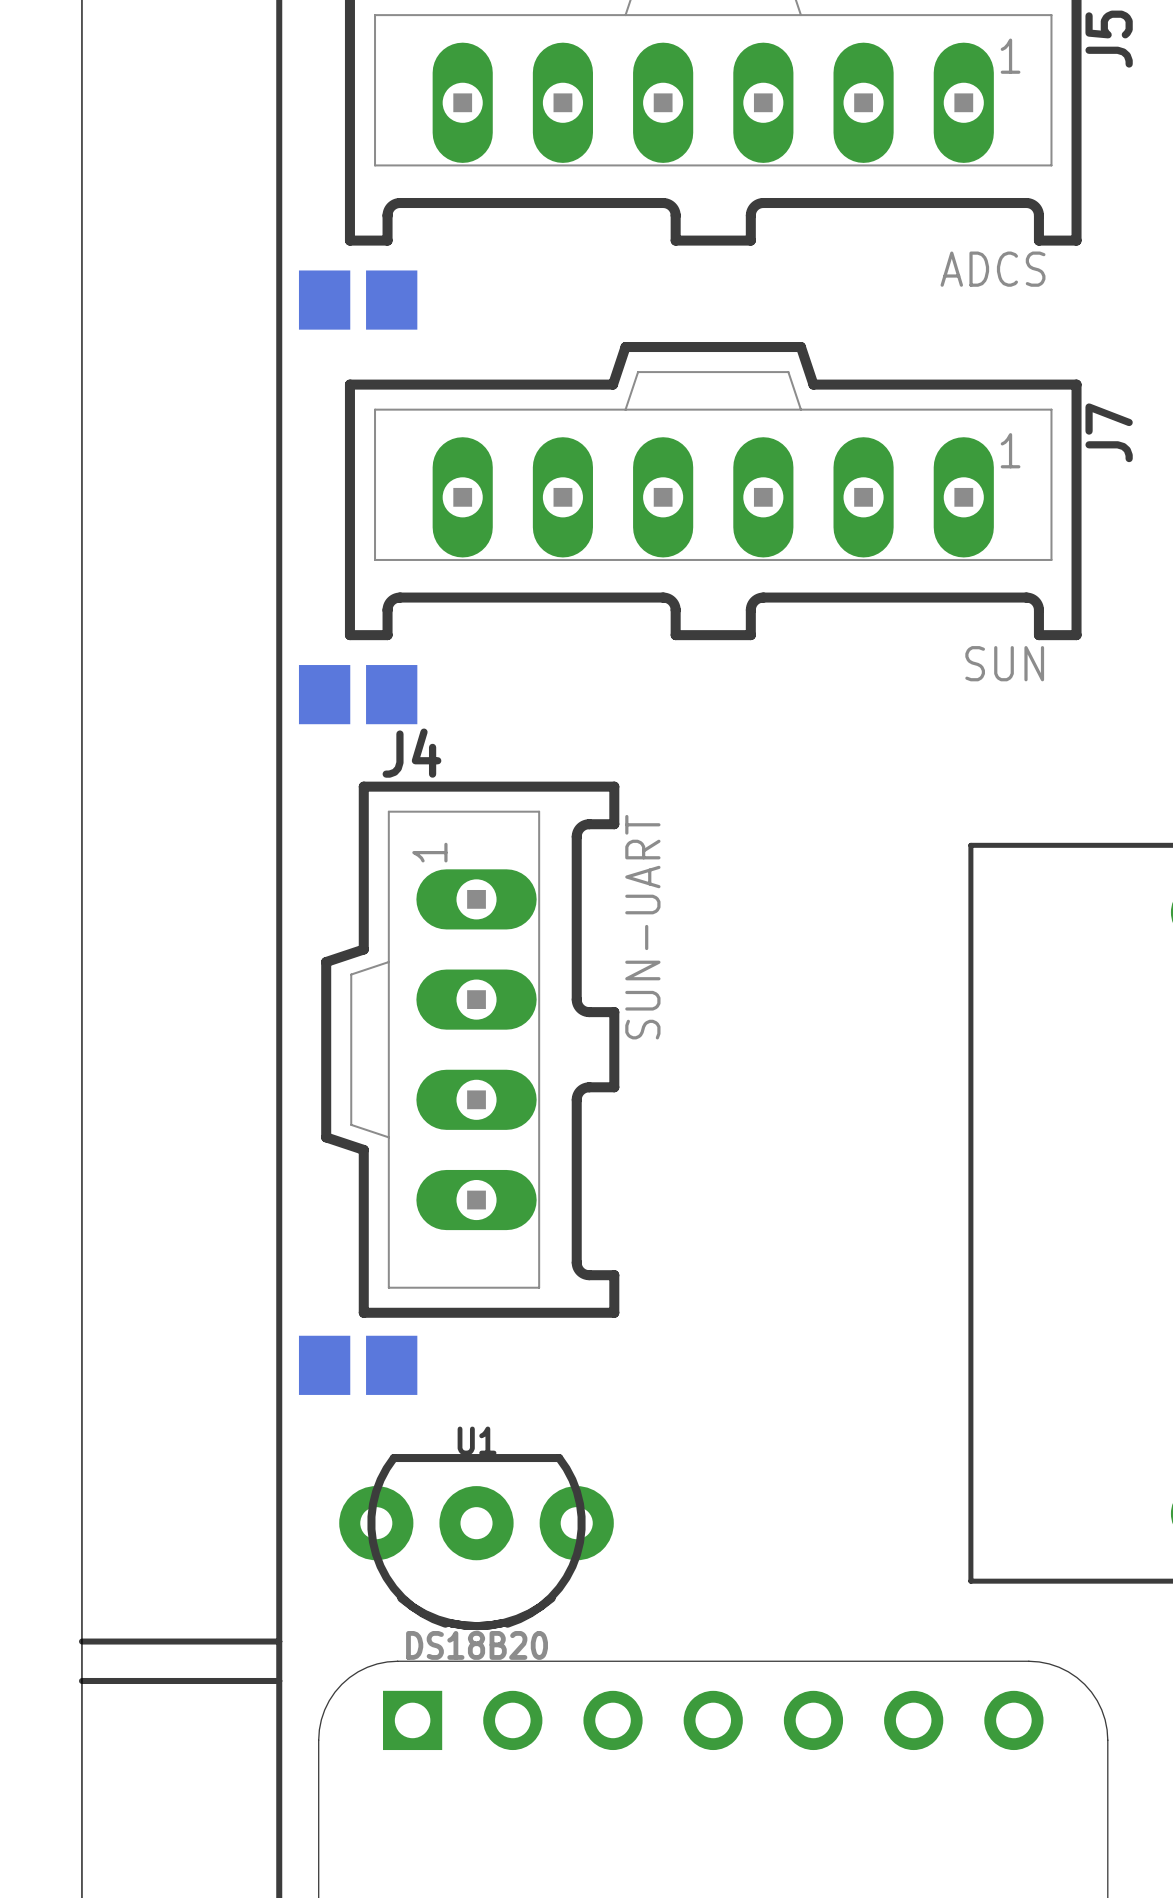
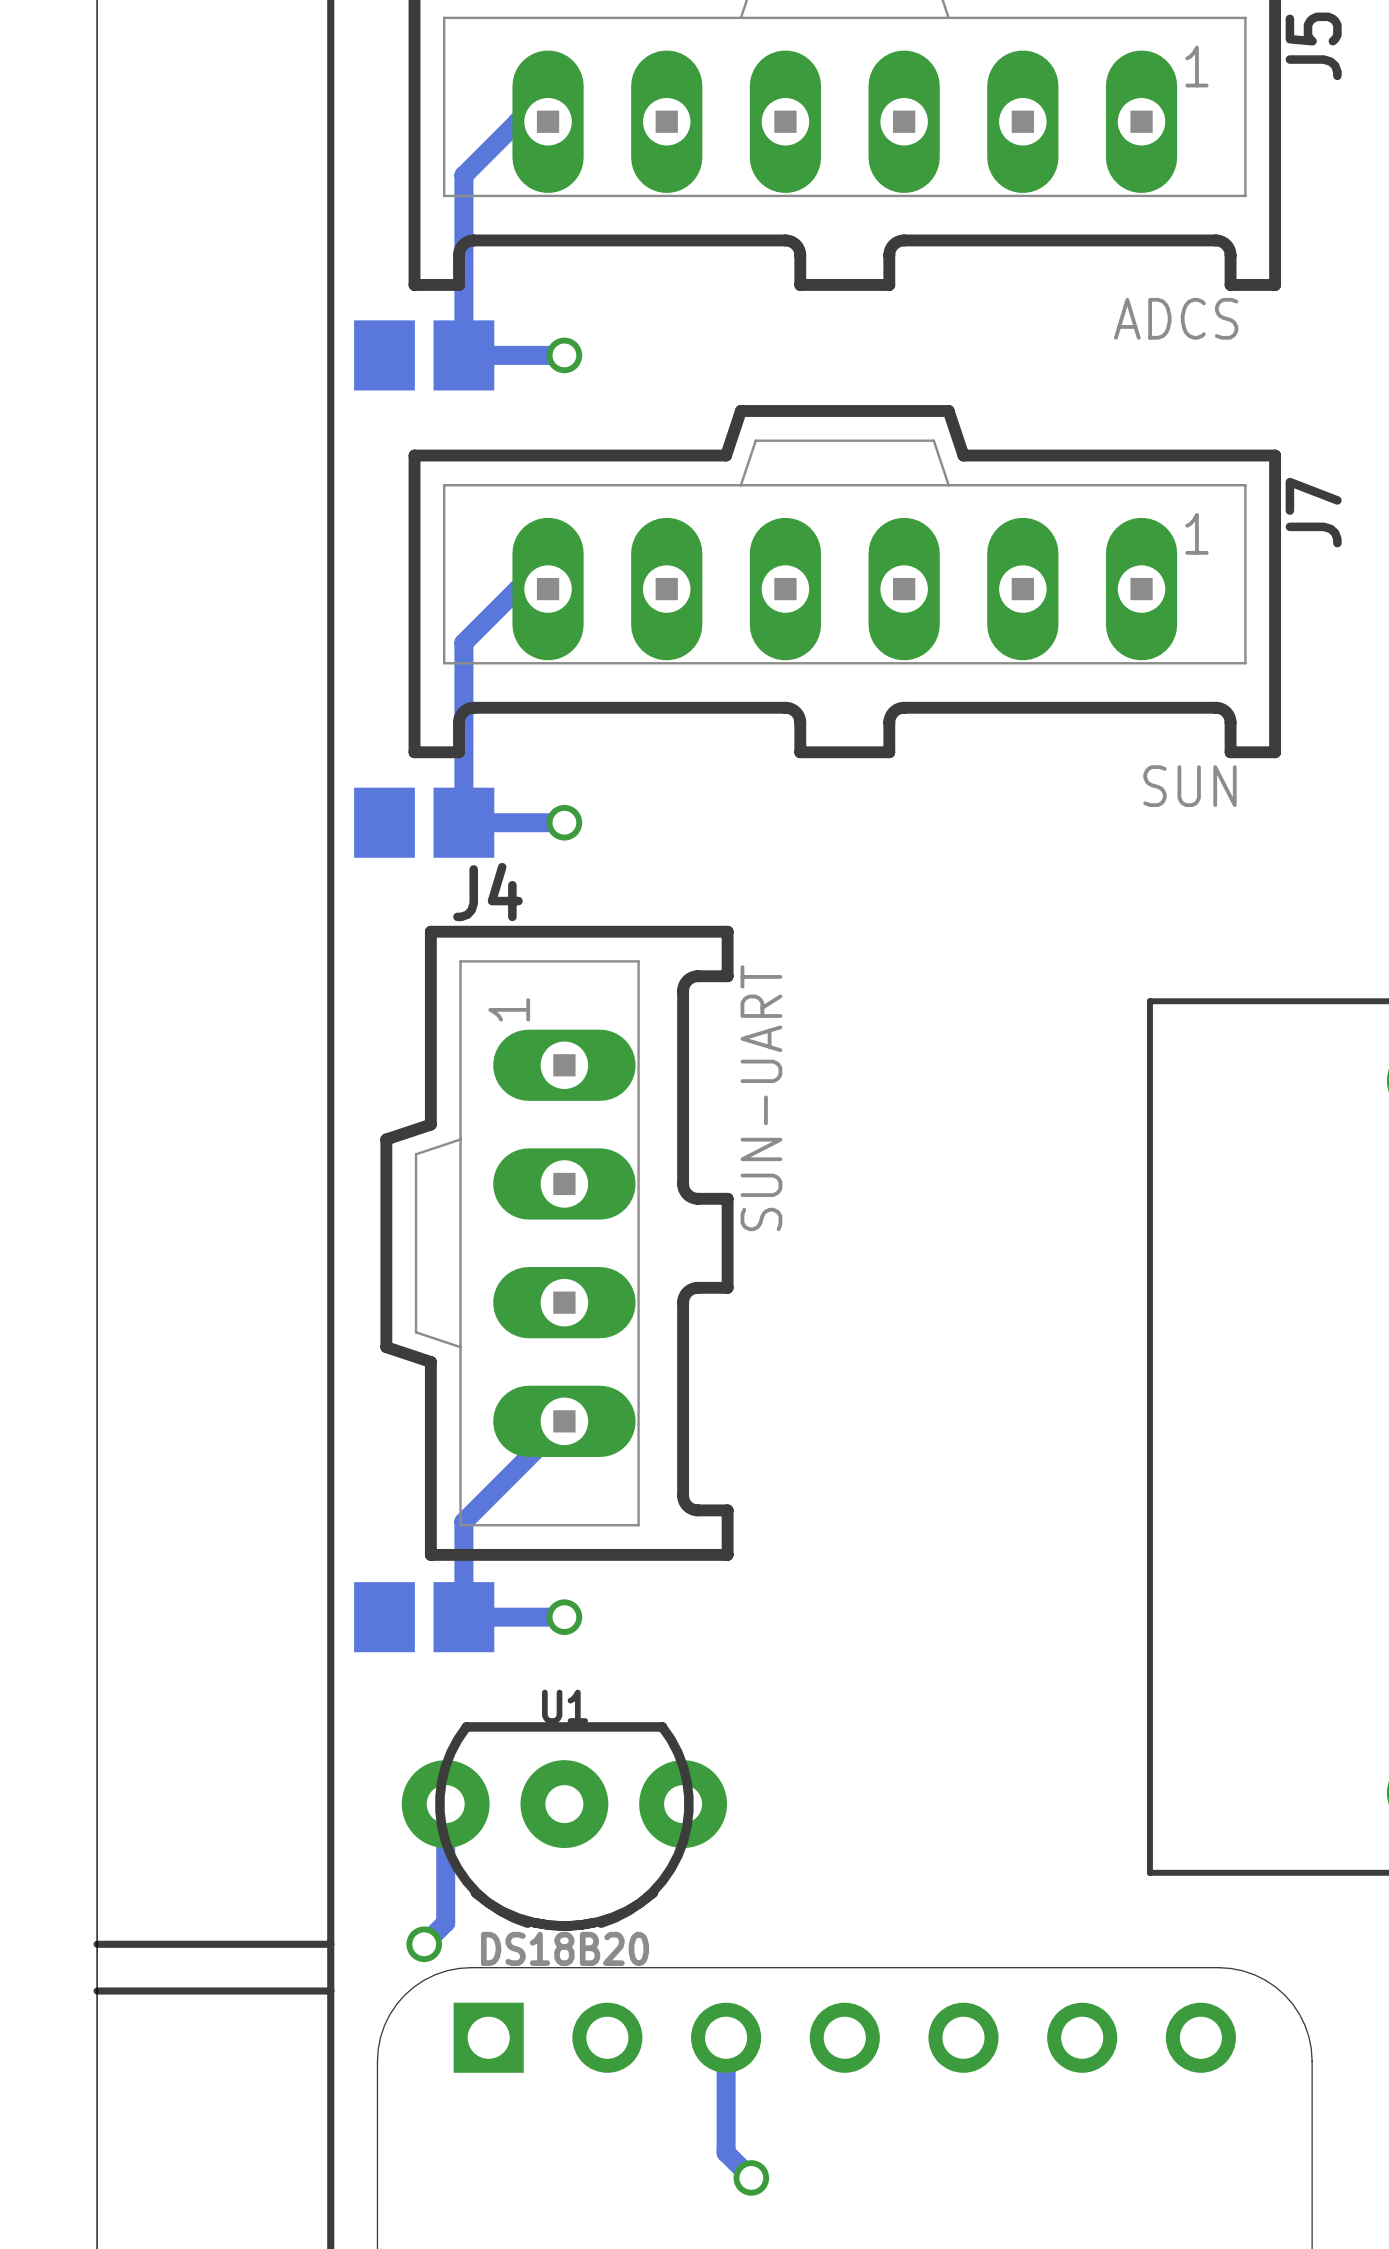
bottom track: none -> (548, 121) (517, 121) (463, 175) (463, 355) (564, 355)
via: none -> (564, 355)
bottom track: none -> (548, 589) (517, 589) (463, 642) (463, 822) (564, 822)
via: none -> (564, 822)
bottom track: none -> (564, 1421) (463, 1521) (463, 1617) (564, 1617)
via: none -> (564, 1617)
bottom track: none -> (445, 1804) (445, 1922) (424, 1944)
via: none -> (424, 1944)
bottom track: none -> (726, 2037) (726, 2152) (751, 2177)
via: none -> (751, 2177)

